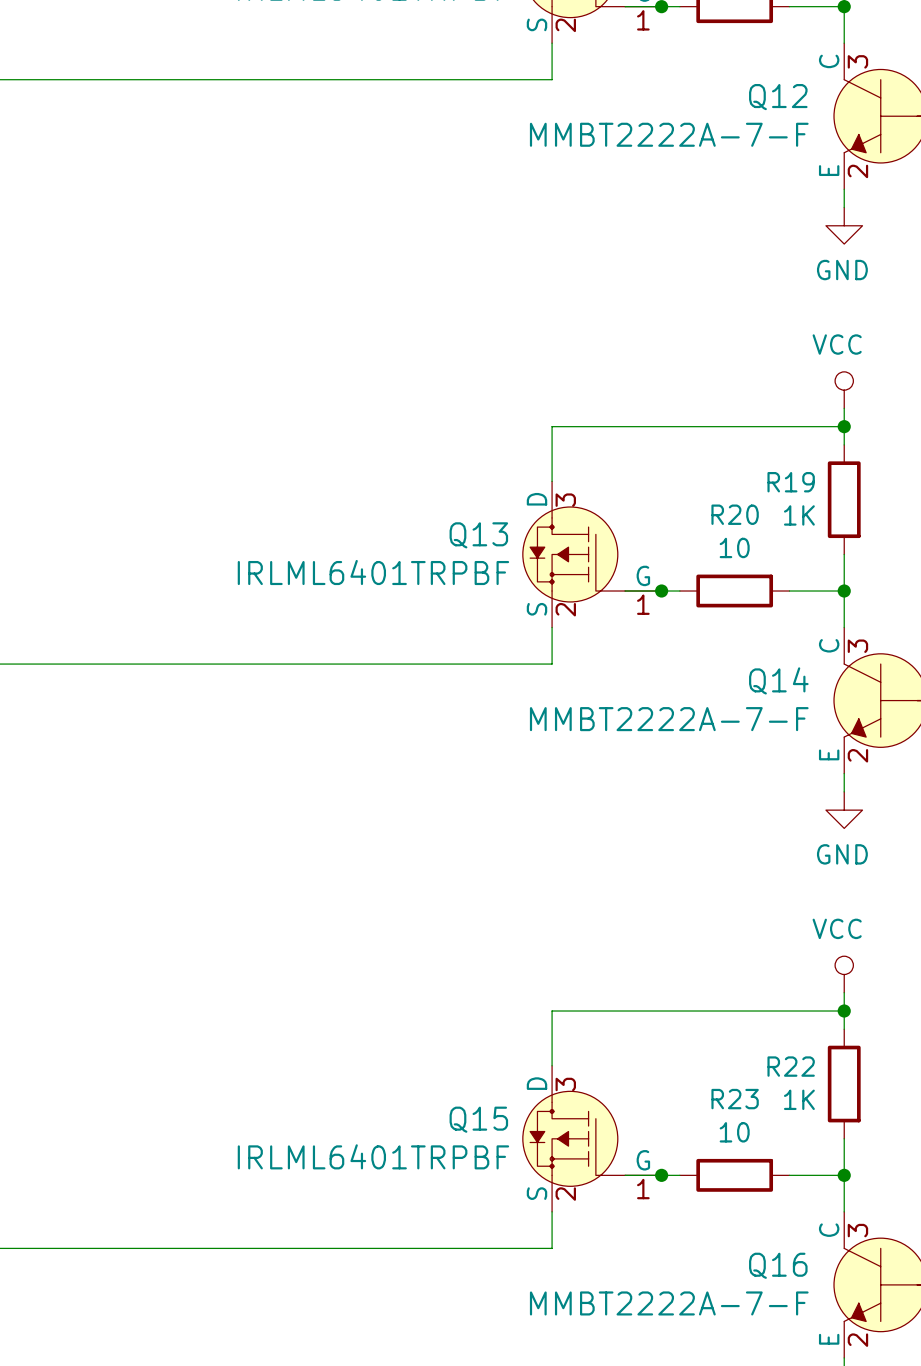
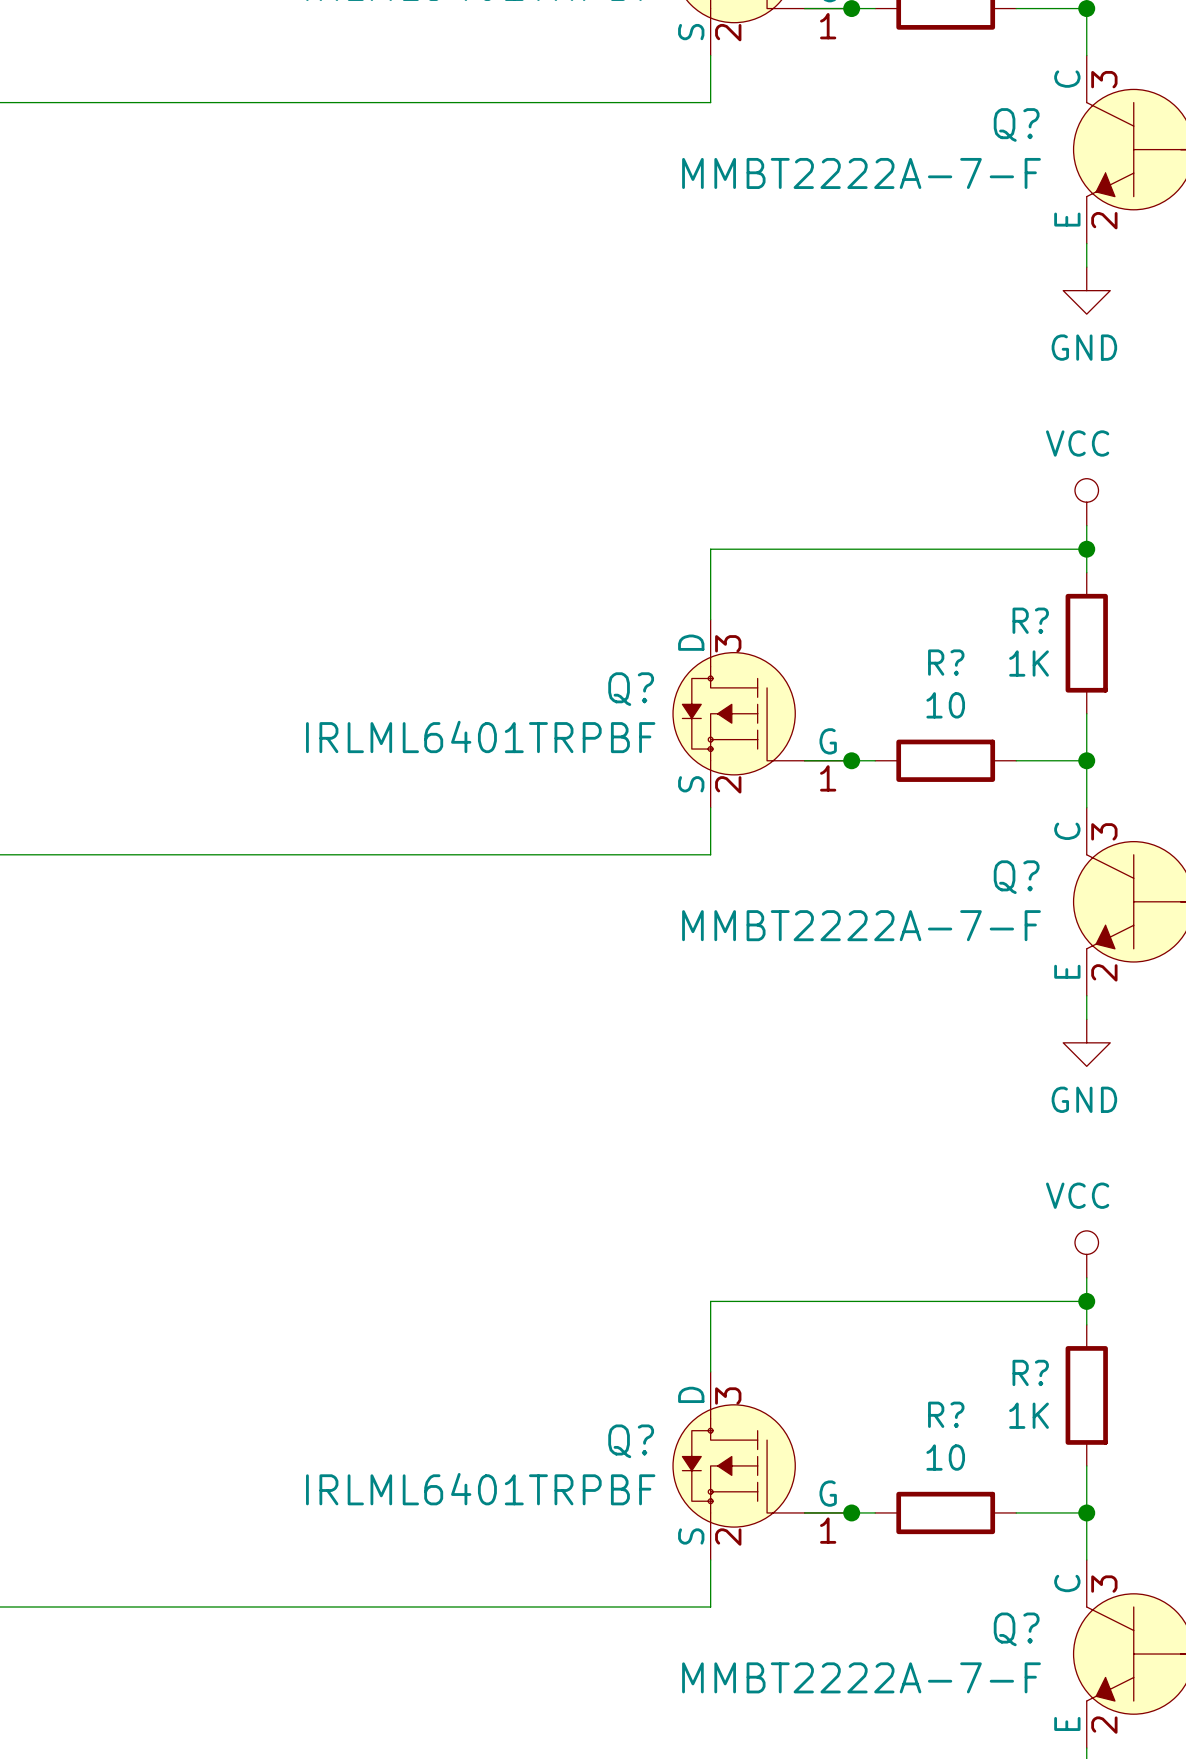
Q12 name: Q12 (778, 97) -> Q? (1016, 124)
R19 name: R19 (791, 482) -> R? (1030, 620)
R20 name: R20 (735, 514) -> R? (946, 662)
Q13 name: Q13 (478, 535) -> Q? (631, 689)
Q14 name: Q14 (778, 680) -> Q? (1016, 877)
R22 name: R22 (791, 1066) -> R? (1030, 1372)
R23 name: R23 (735, 1099) -> R? (946, 1414)
Q15 name: Q15 (478, 1119) -> Q? (631, 1441)
Q16 name: Q16 (778, 1265) -> Q? (1016, 1629)

